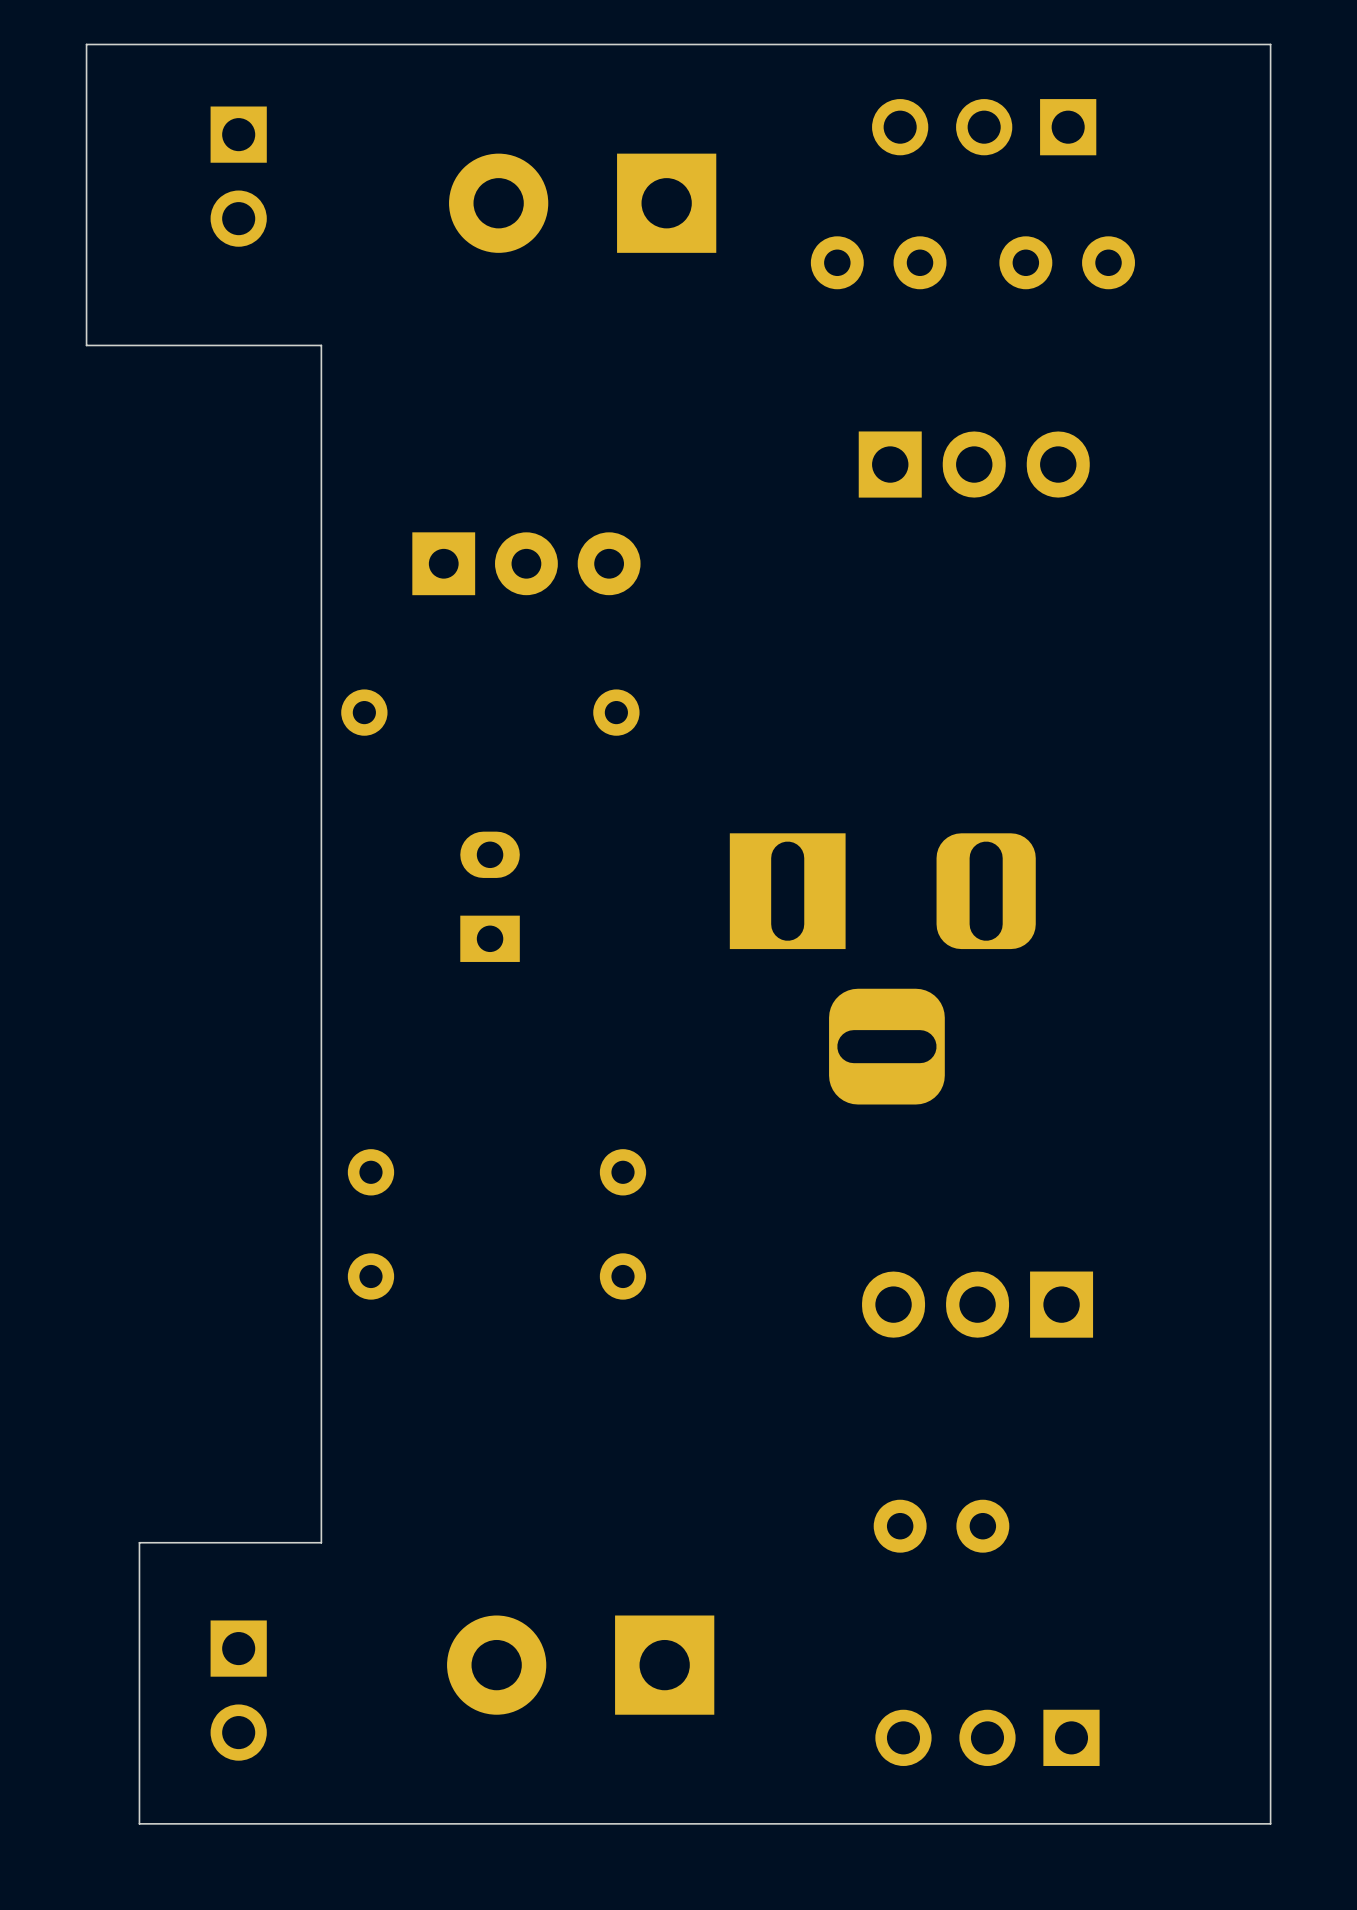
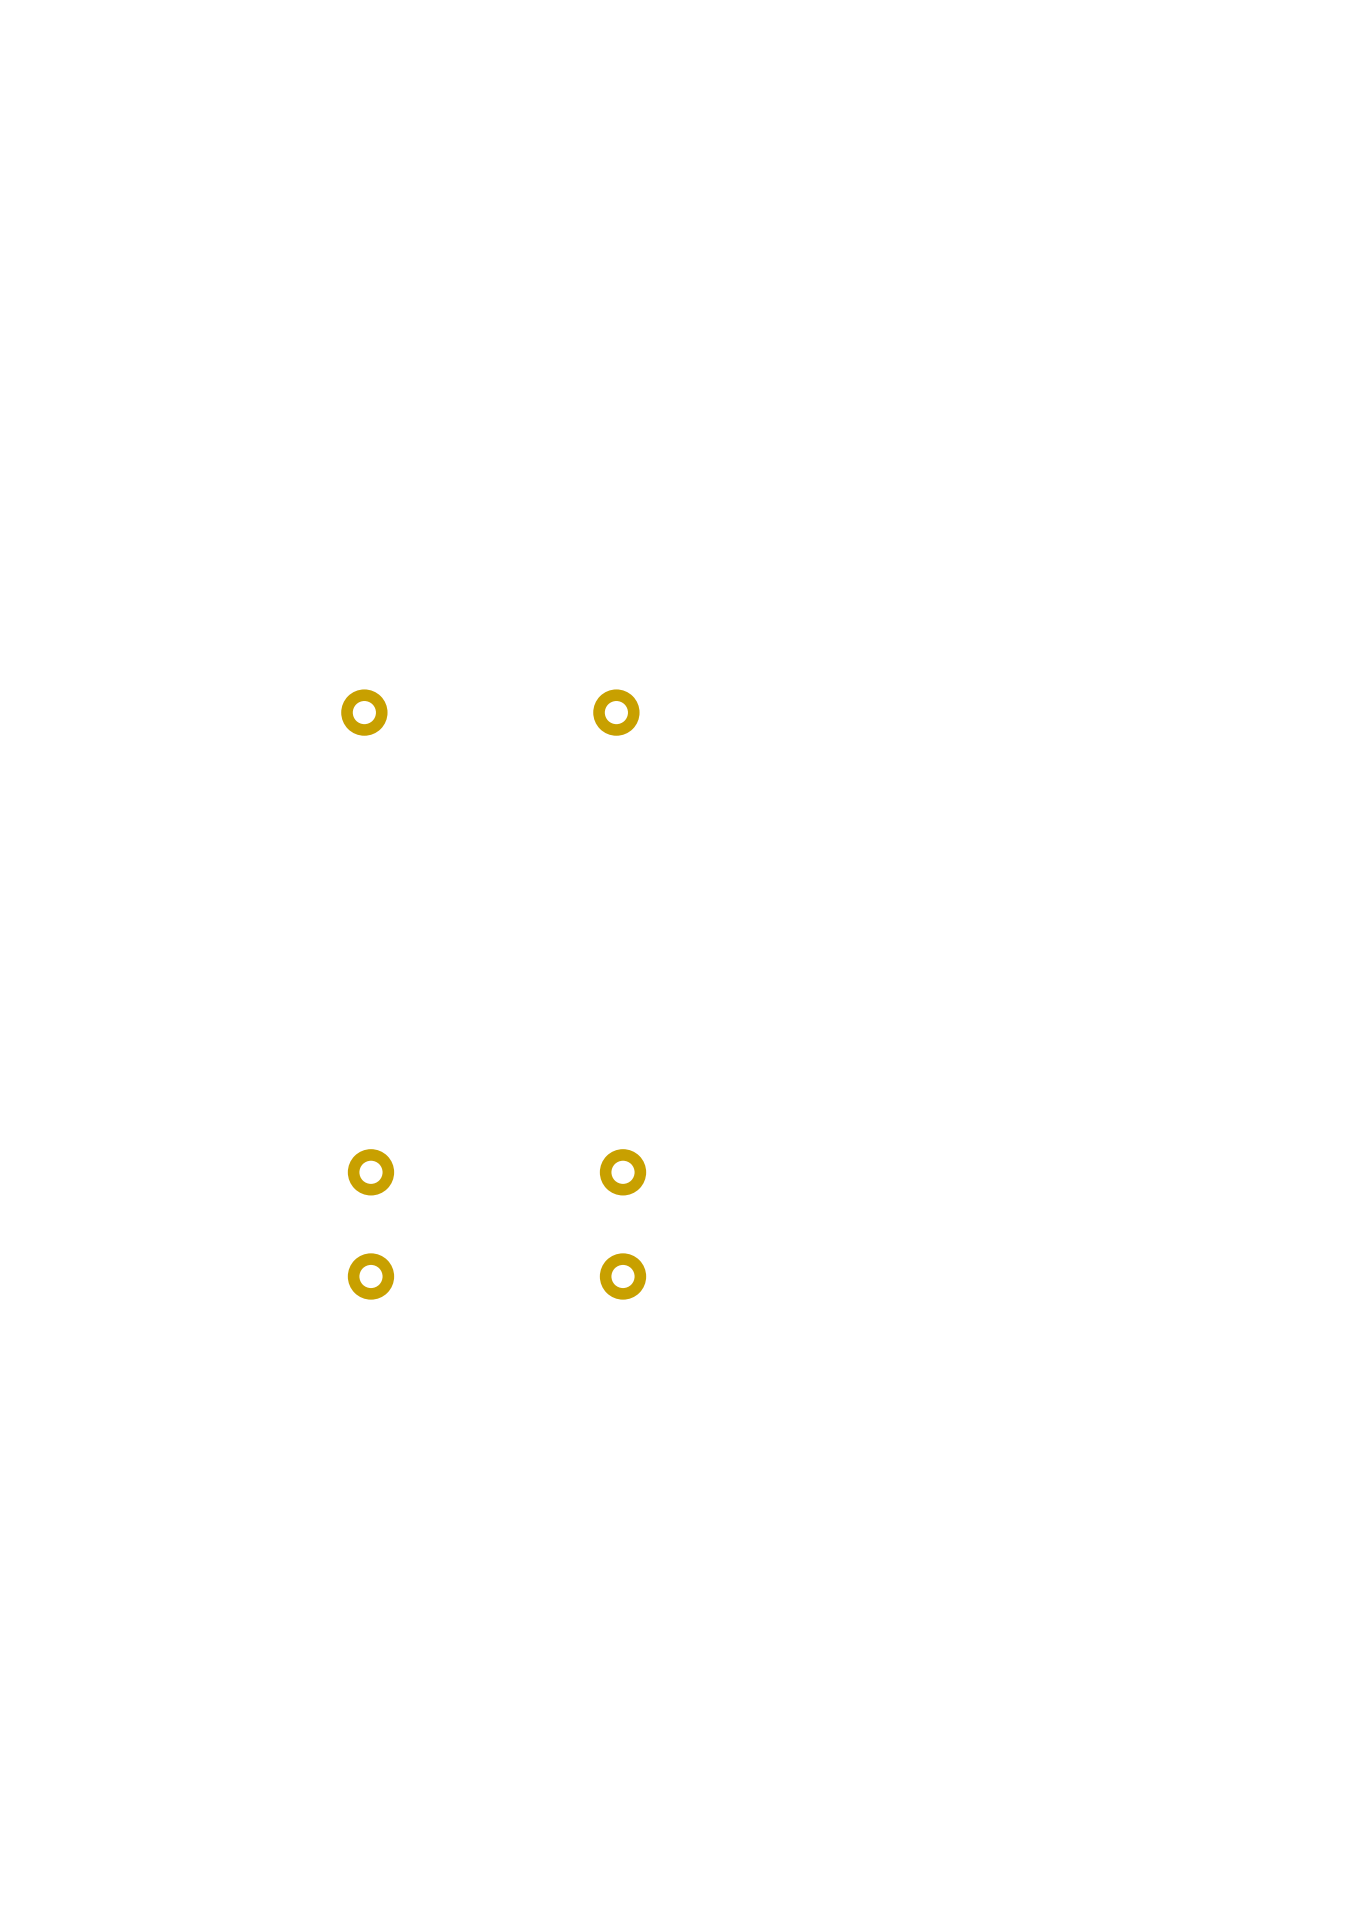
board edge: (1270, 44) (1270, 1823) (139, 1823) (139, 1542) (321, 1542) (321, 345) (86, 345) (86, 44) (1270, 44) -> none
part: (984, 127) -> none
part: (238, 176) -> none
part: (582, 203) -> none
part: (878, 262) -> none
part: (1067, 262) -> none
part: (974, 464) -> none
part: (526, 563) -> none
part: (490, 896) -> none
part: (882, 968) -> none
part: (977, 1304) -> none
part: (941, 1526) -> none
part: (580, 1665) -> none
part: (238, 1690) -> none
part: (987, 1737) -> none

